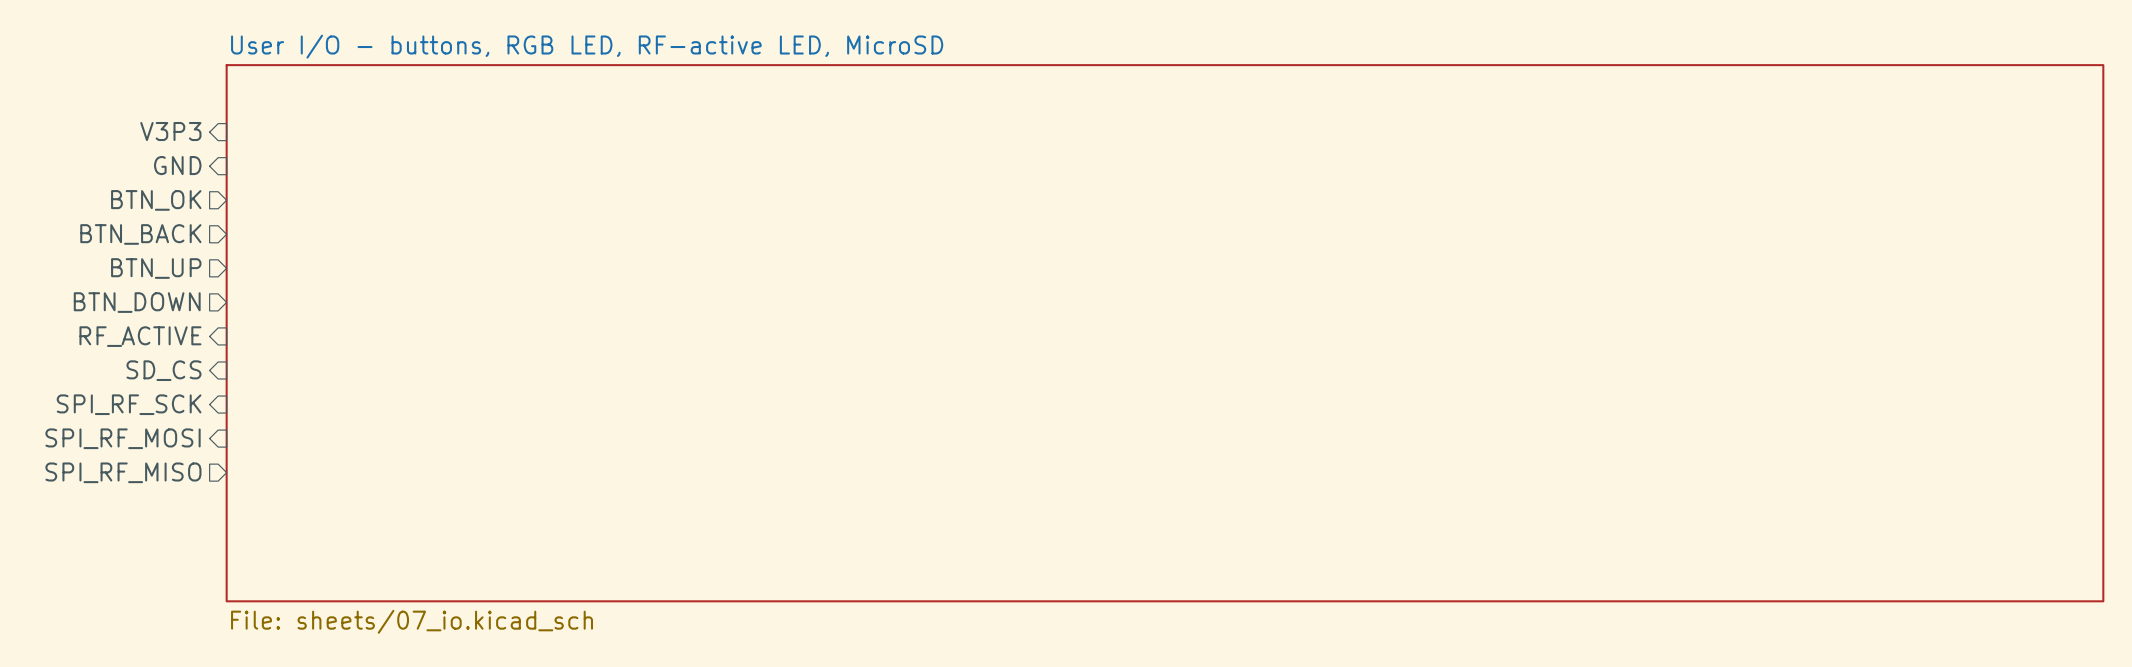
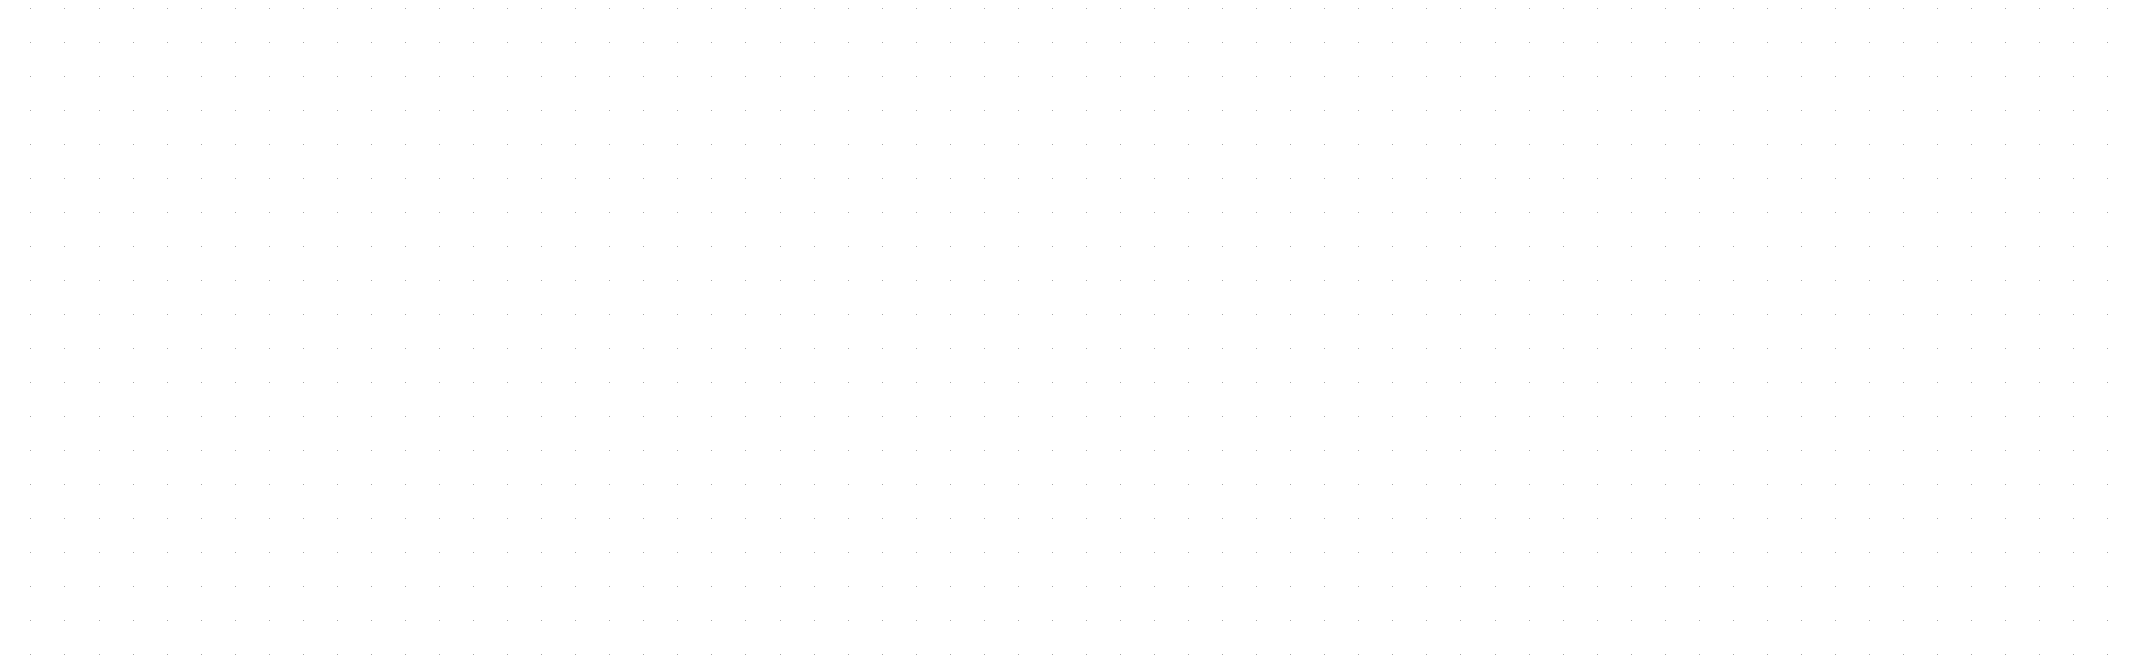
sheet pin: V3P3 (170, 131) -> none
sheet pin: GND (177, 165) -> none
sheet pin: BTN_OK (156, 200) -> none
sheet pin: BTN_BACK (140, 234) -> none
sheet pin: BTN_UP (156, 268) -> none
sheet pin: BTN_DOWN (137, 302) -> none
sheet User I/O - buttons, RGB LED, RF-active LED, MicroSD: File: sheets/07_io.kicad_sch (1164, 333) -> none
sheet pin: RF_ACTIVE (140, 336) -> none
sheet pin: SD_CS (163, 370) -> none
sheet pin: SPI_RF_SCK (129, 404) -> none
sheet pin: SPI_RF_MOSI (123, 438) -> none
sheet pin: SPI_RF_MISO (123, 472) -> none

